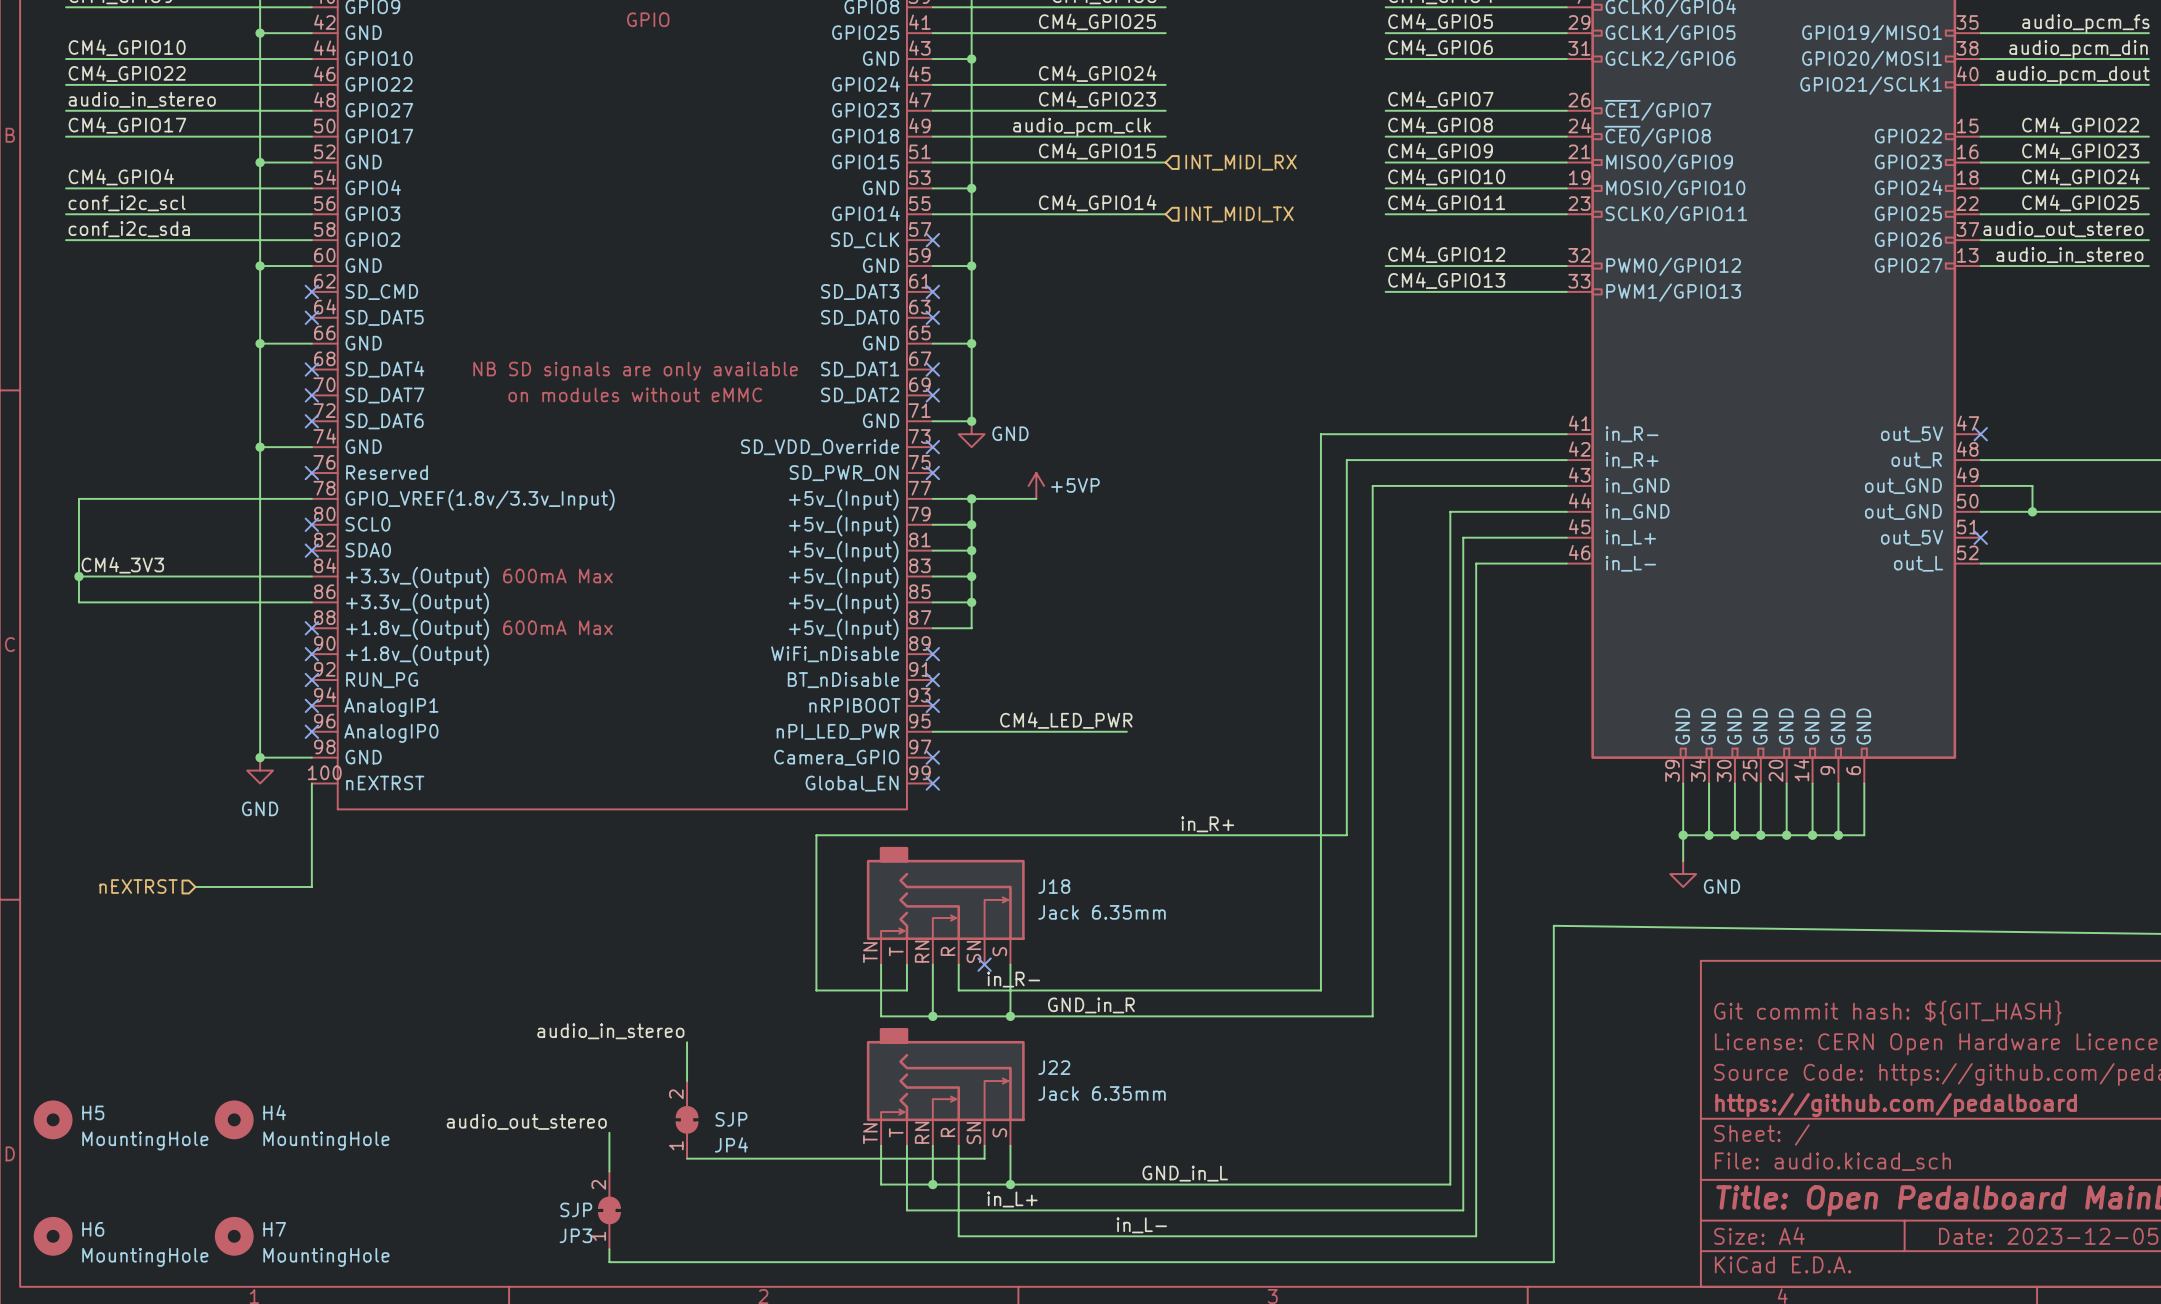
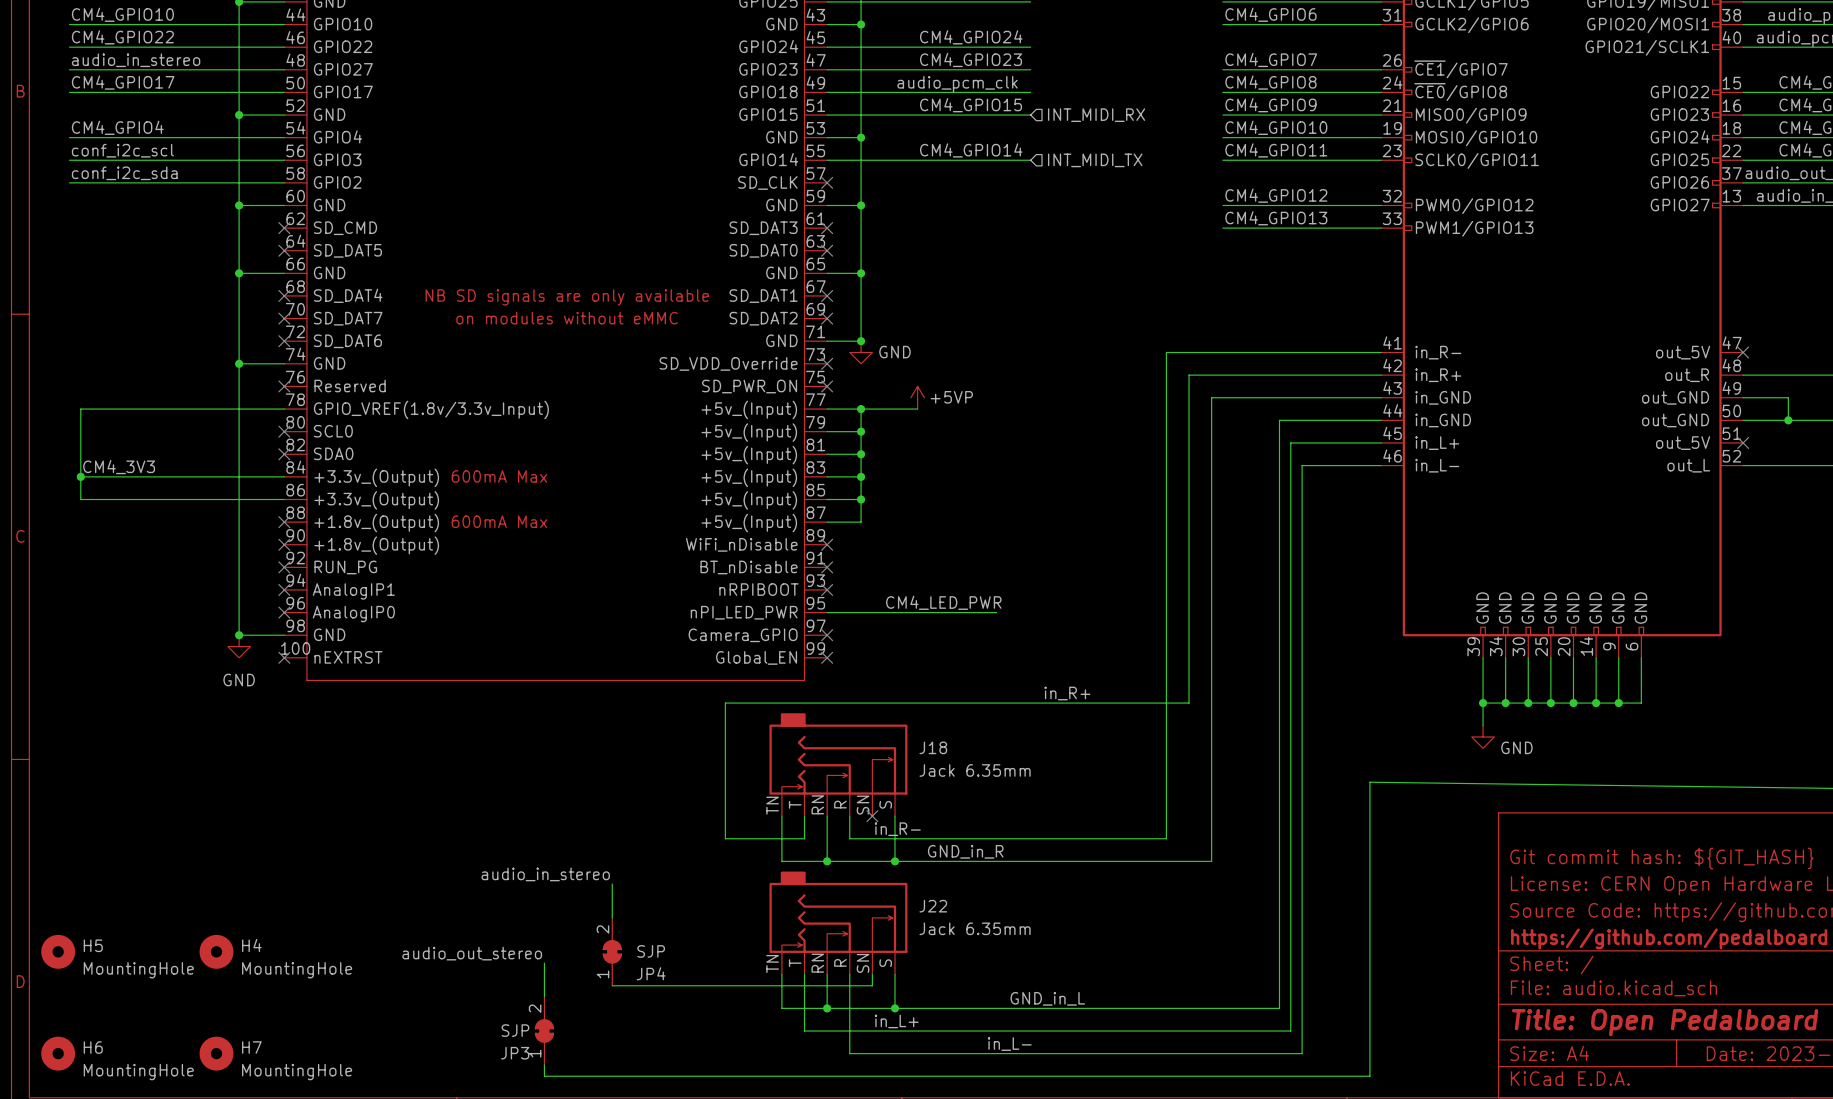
wire: (311, 783) (311, 887) (195, 887) -> none
no-connect mark: none -> (284, 657)
hierarchical label: nEXTRST (138, 886) -> none

